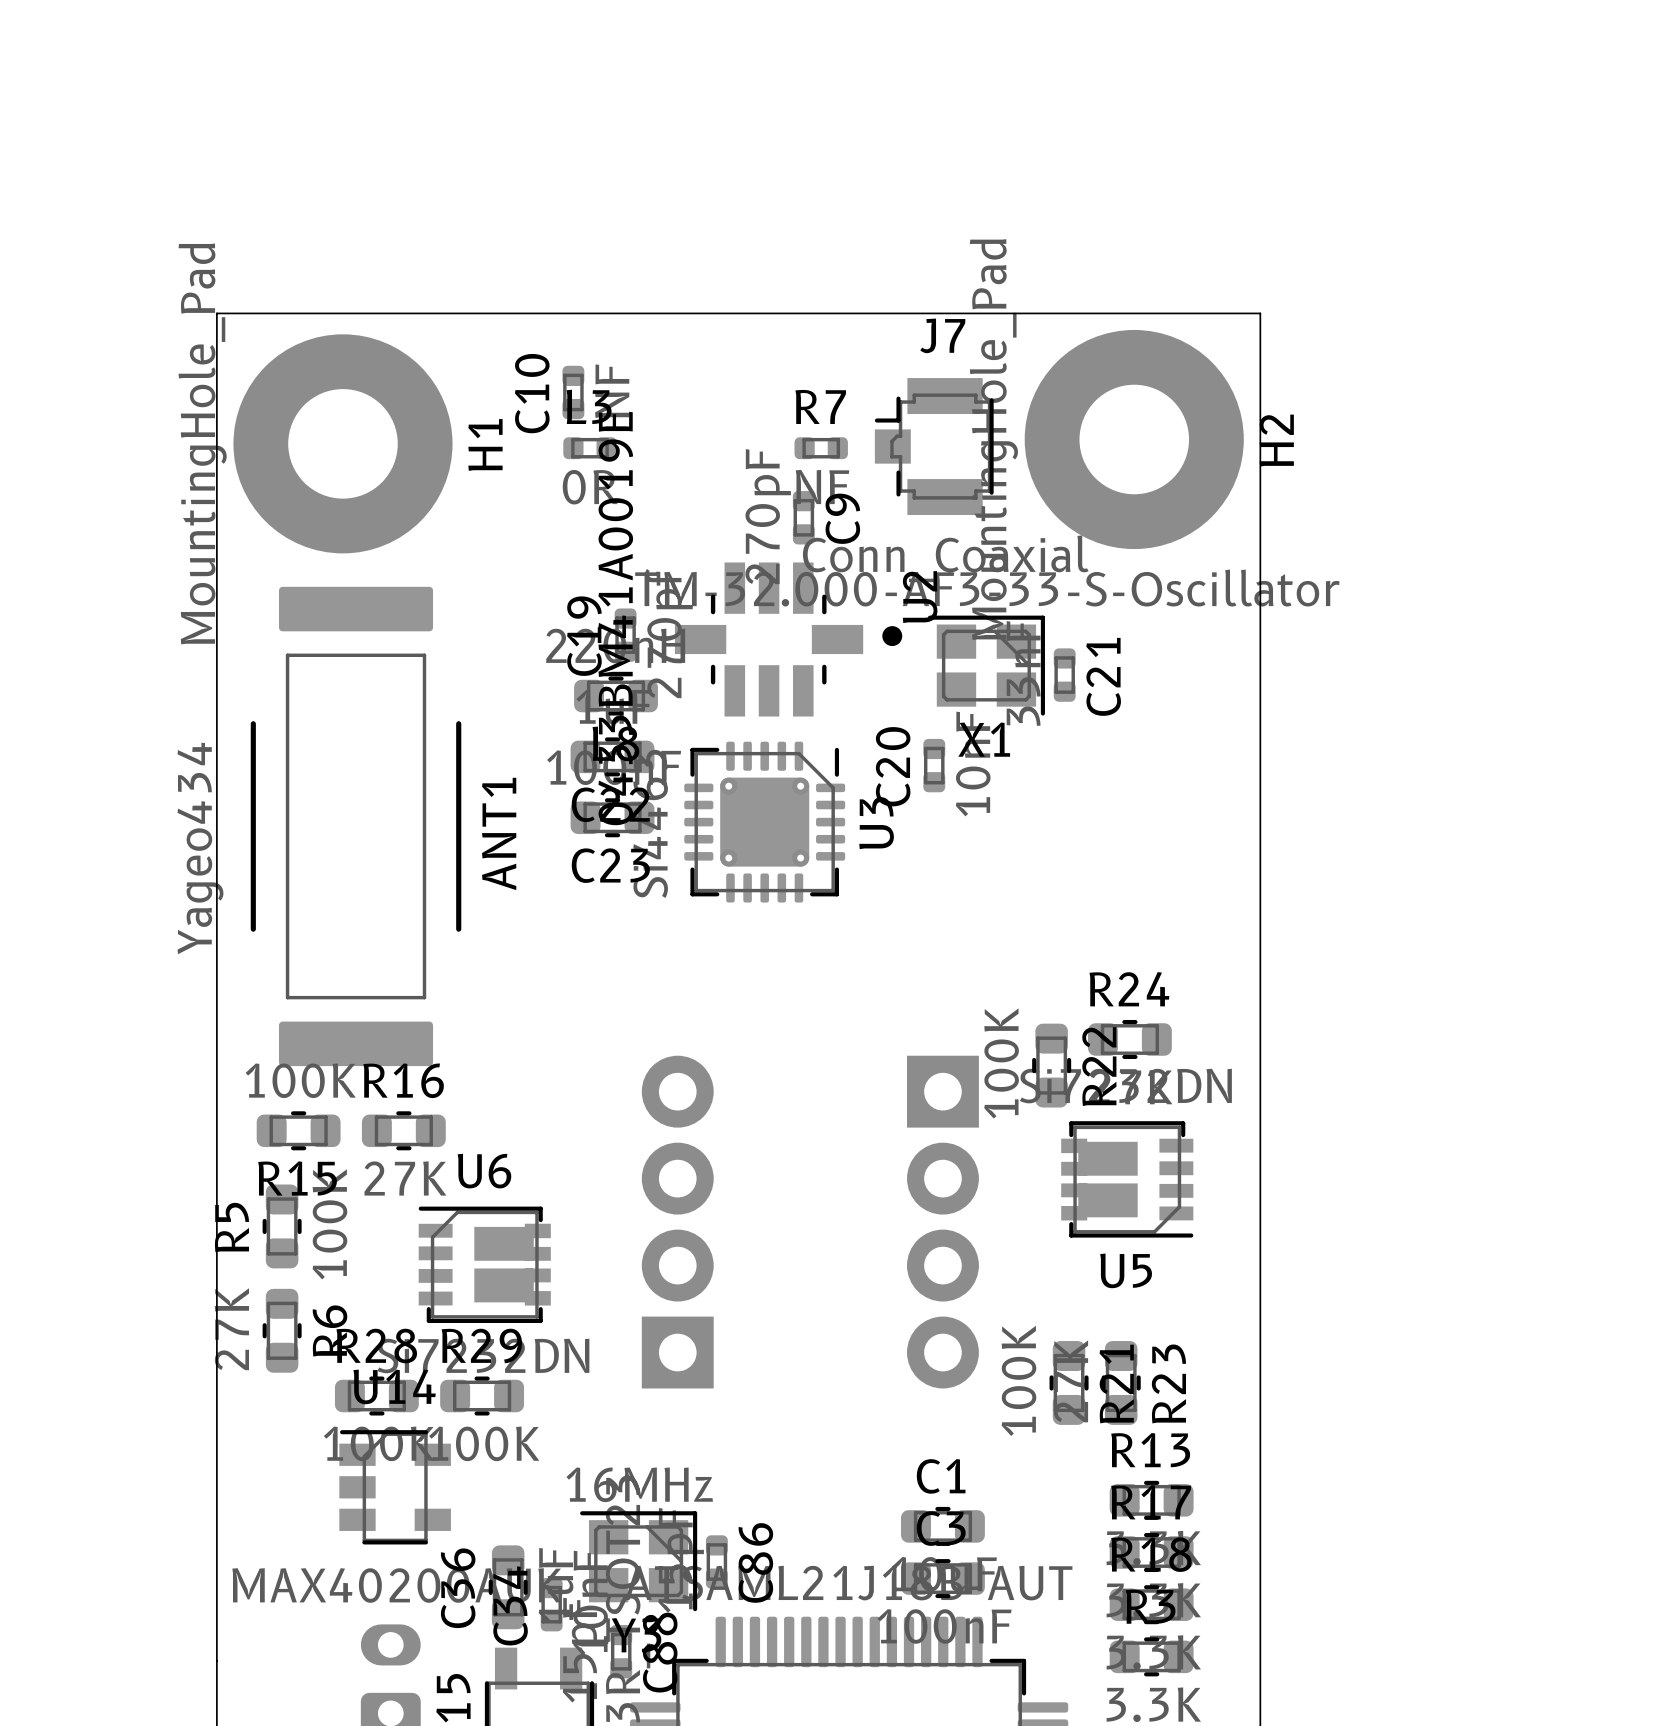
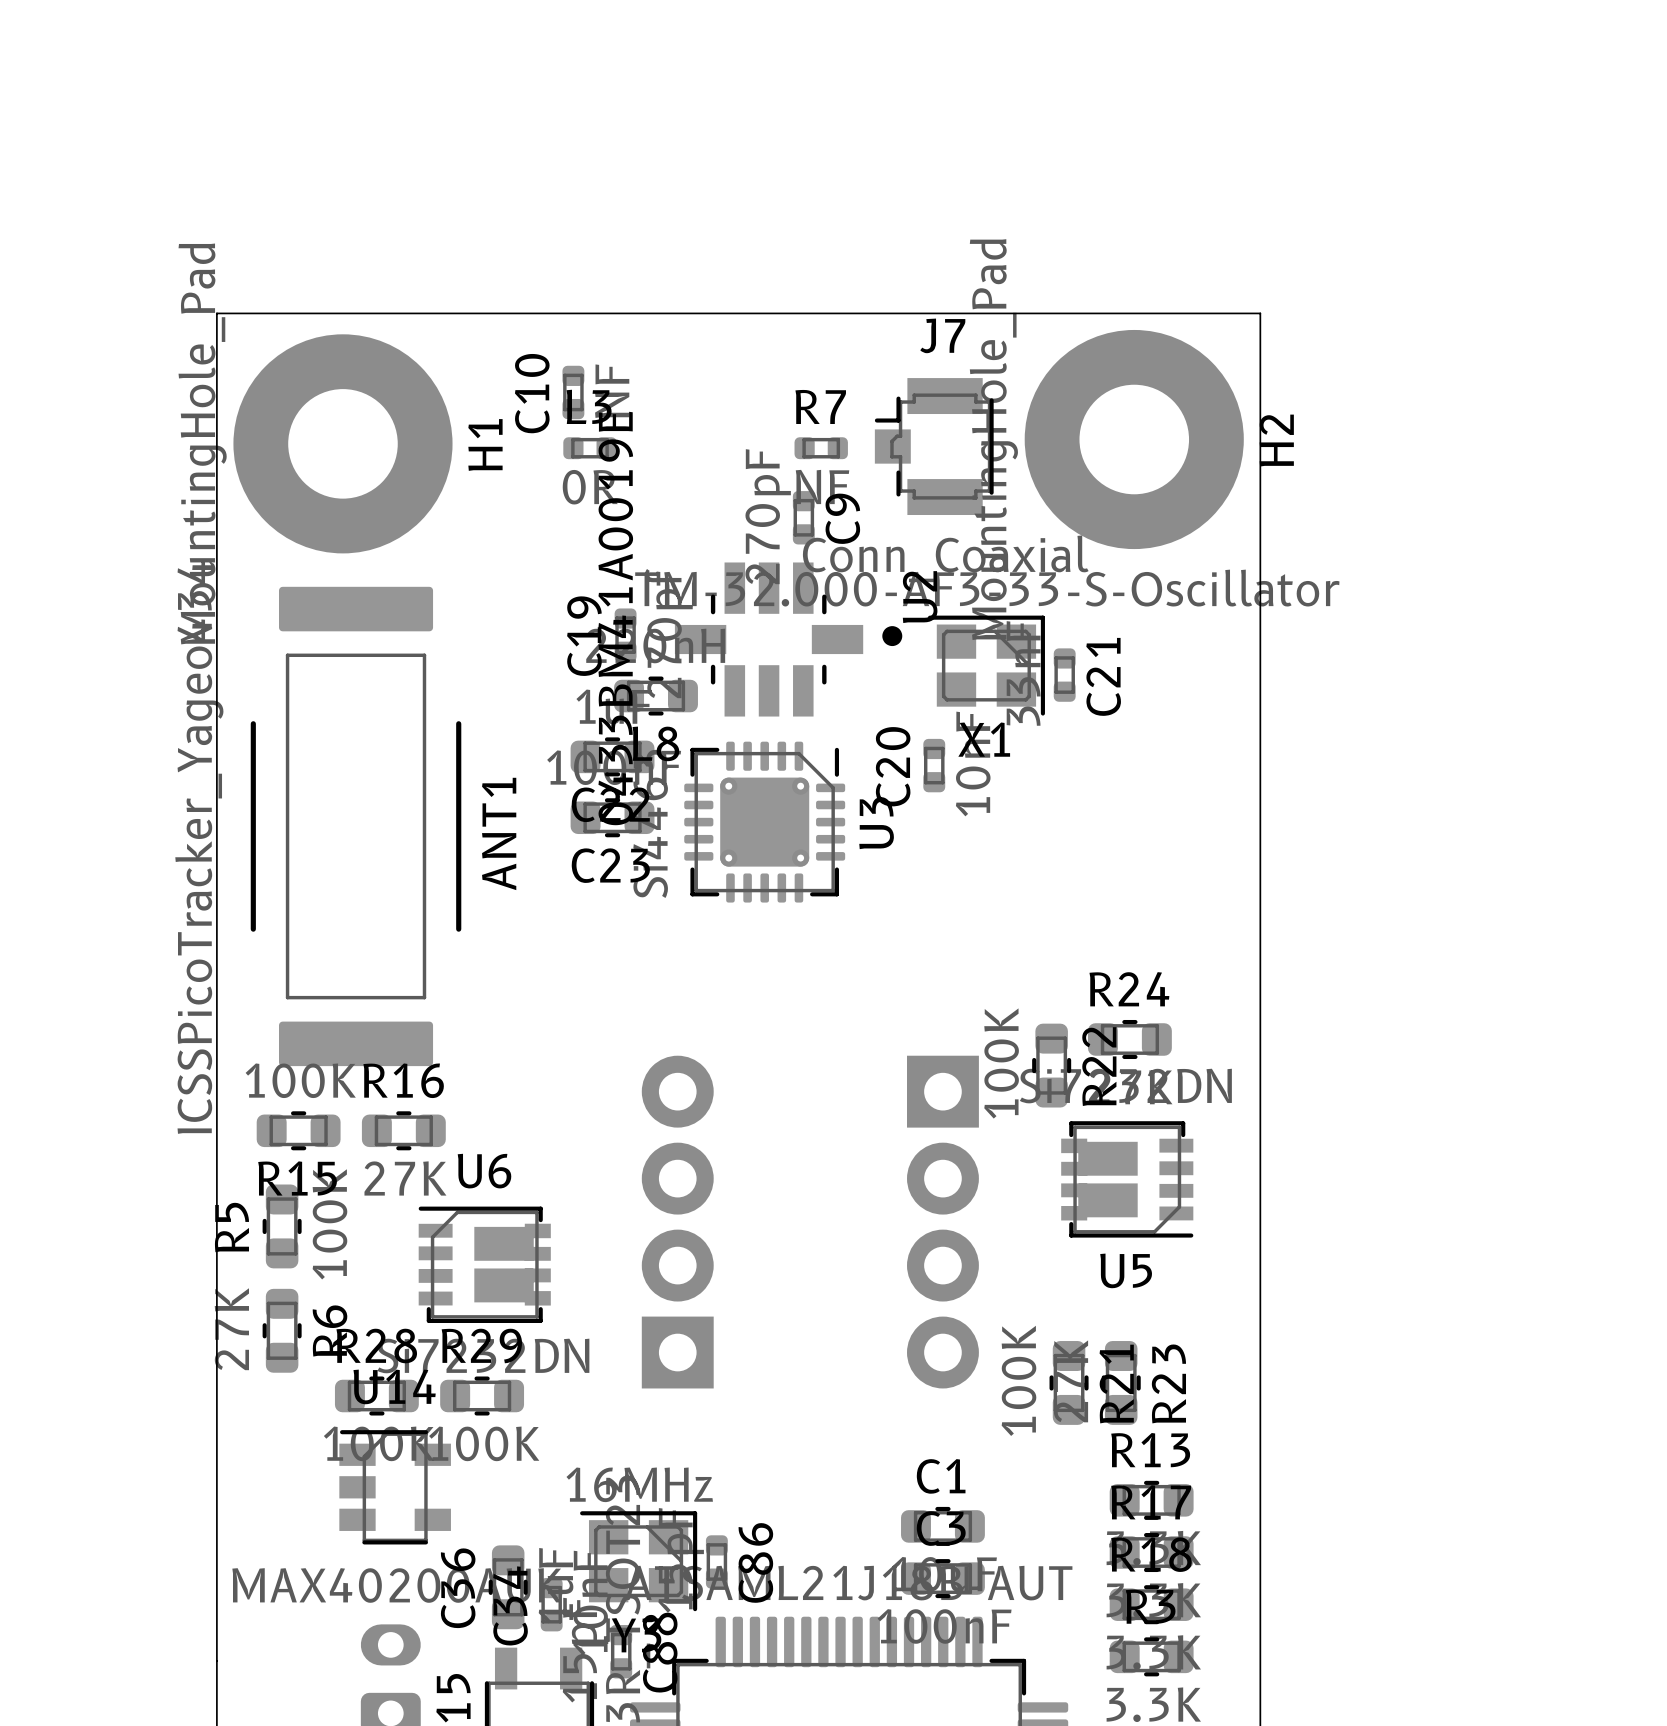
L8 position: (616, 696) -> (656, 696)
ANT1 value: Yageo434 (200, 848) -> ICSSPicoTracker_Yageo434 (199, 847)

